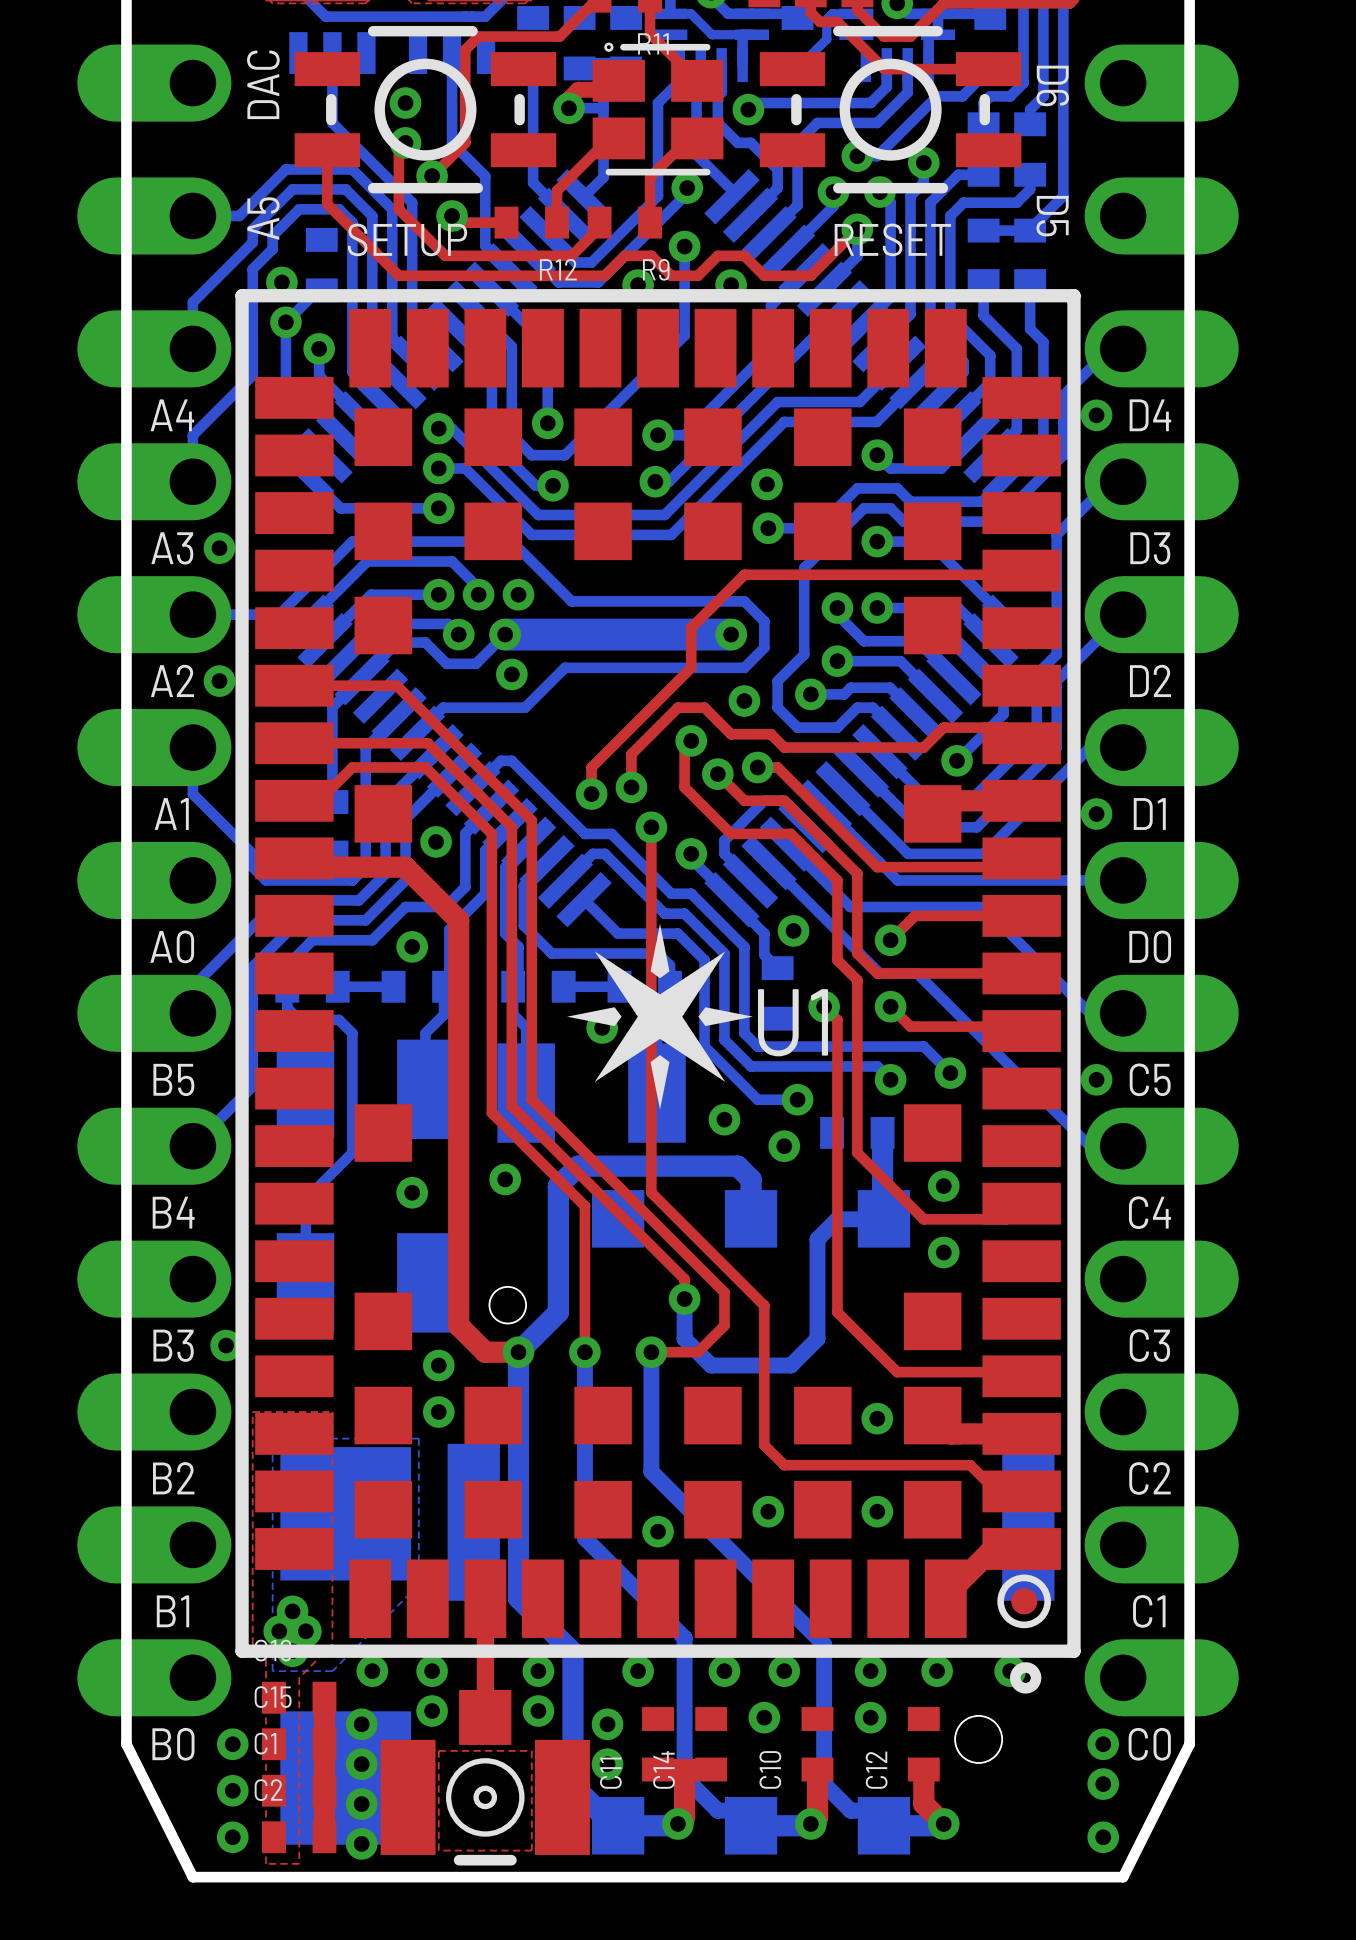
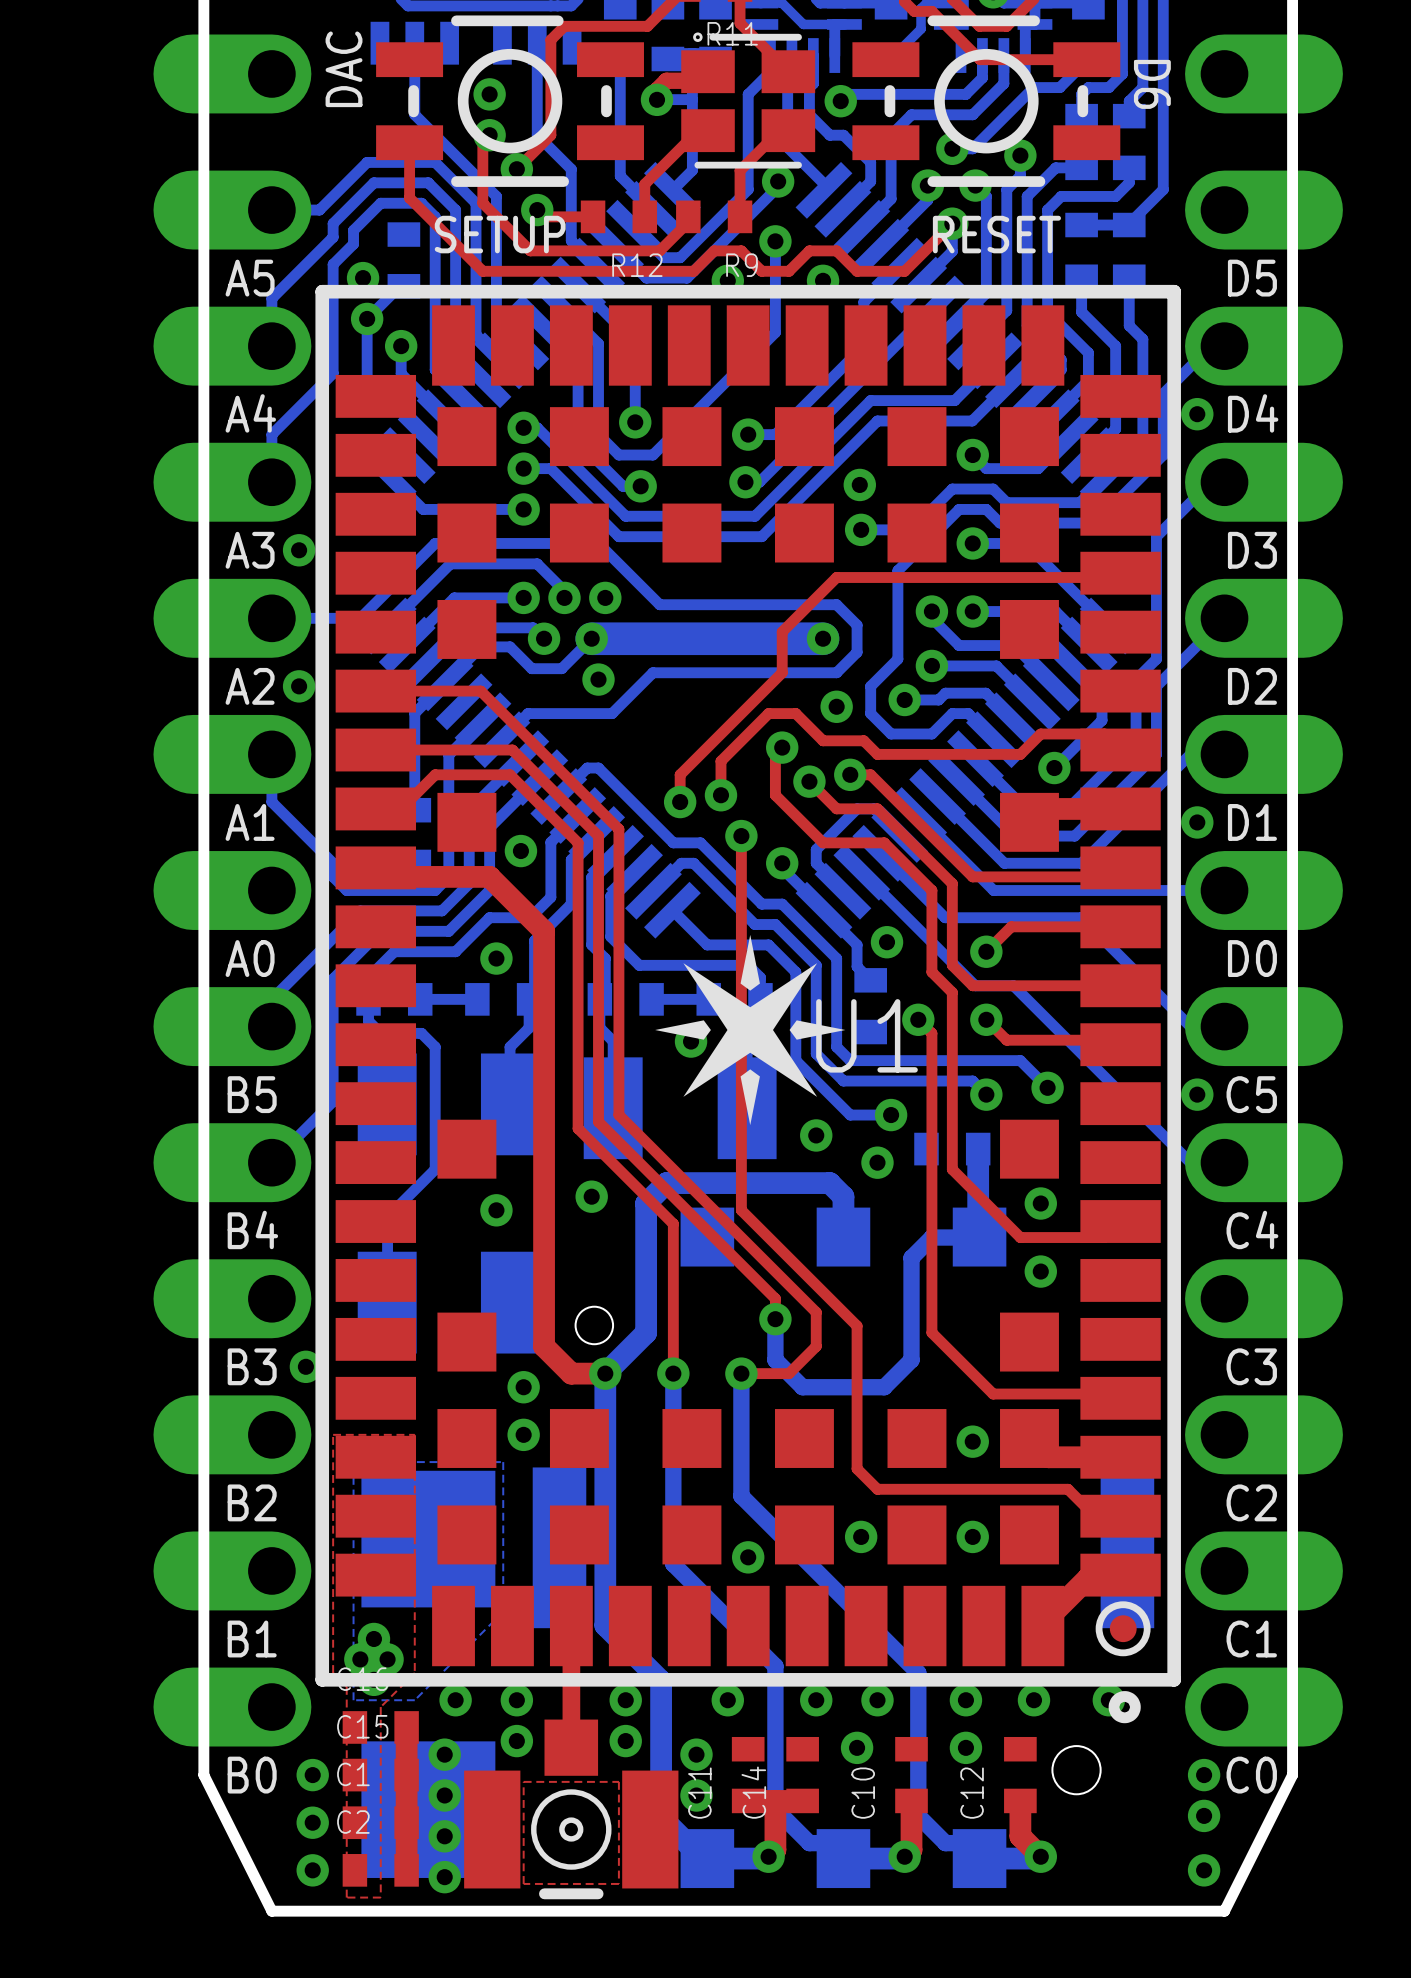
text rotation: 0° (1052, 216) -> 90° counterclockwise (1252, 278)
text position: D5 (1052, 216) -> D5 (1252, 278)
text rotation: 0° (263, 218) -> 90° clockwise (250, 278)
text position: A5 (263, 218) -> A5 (250, 278)

